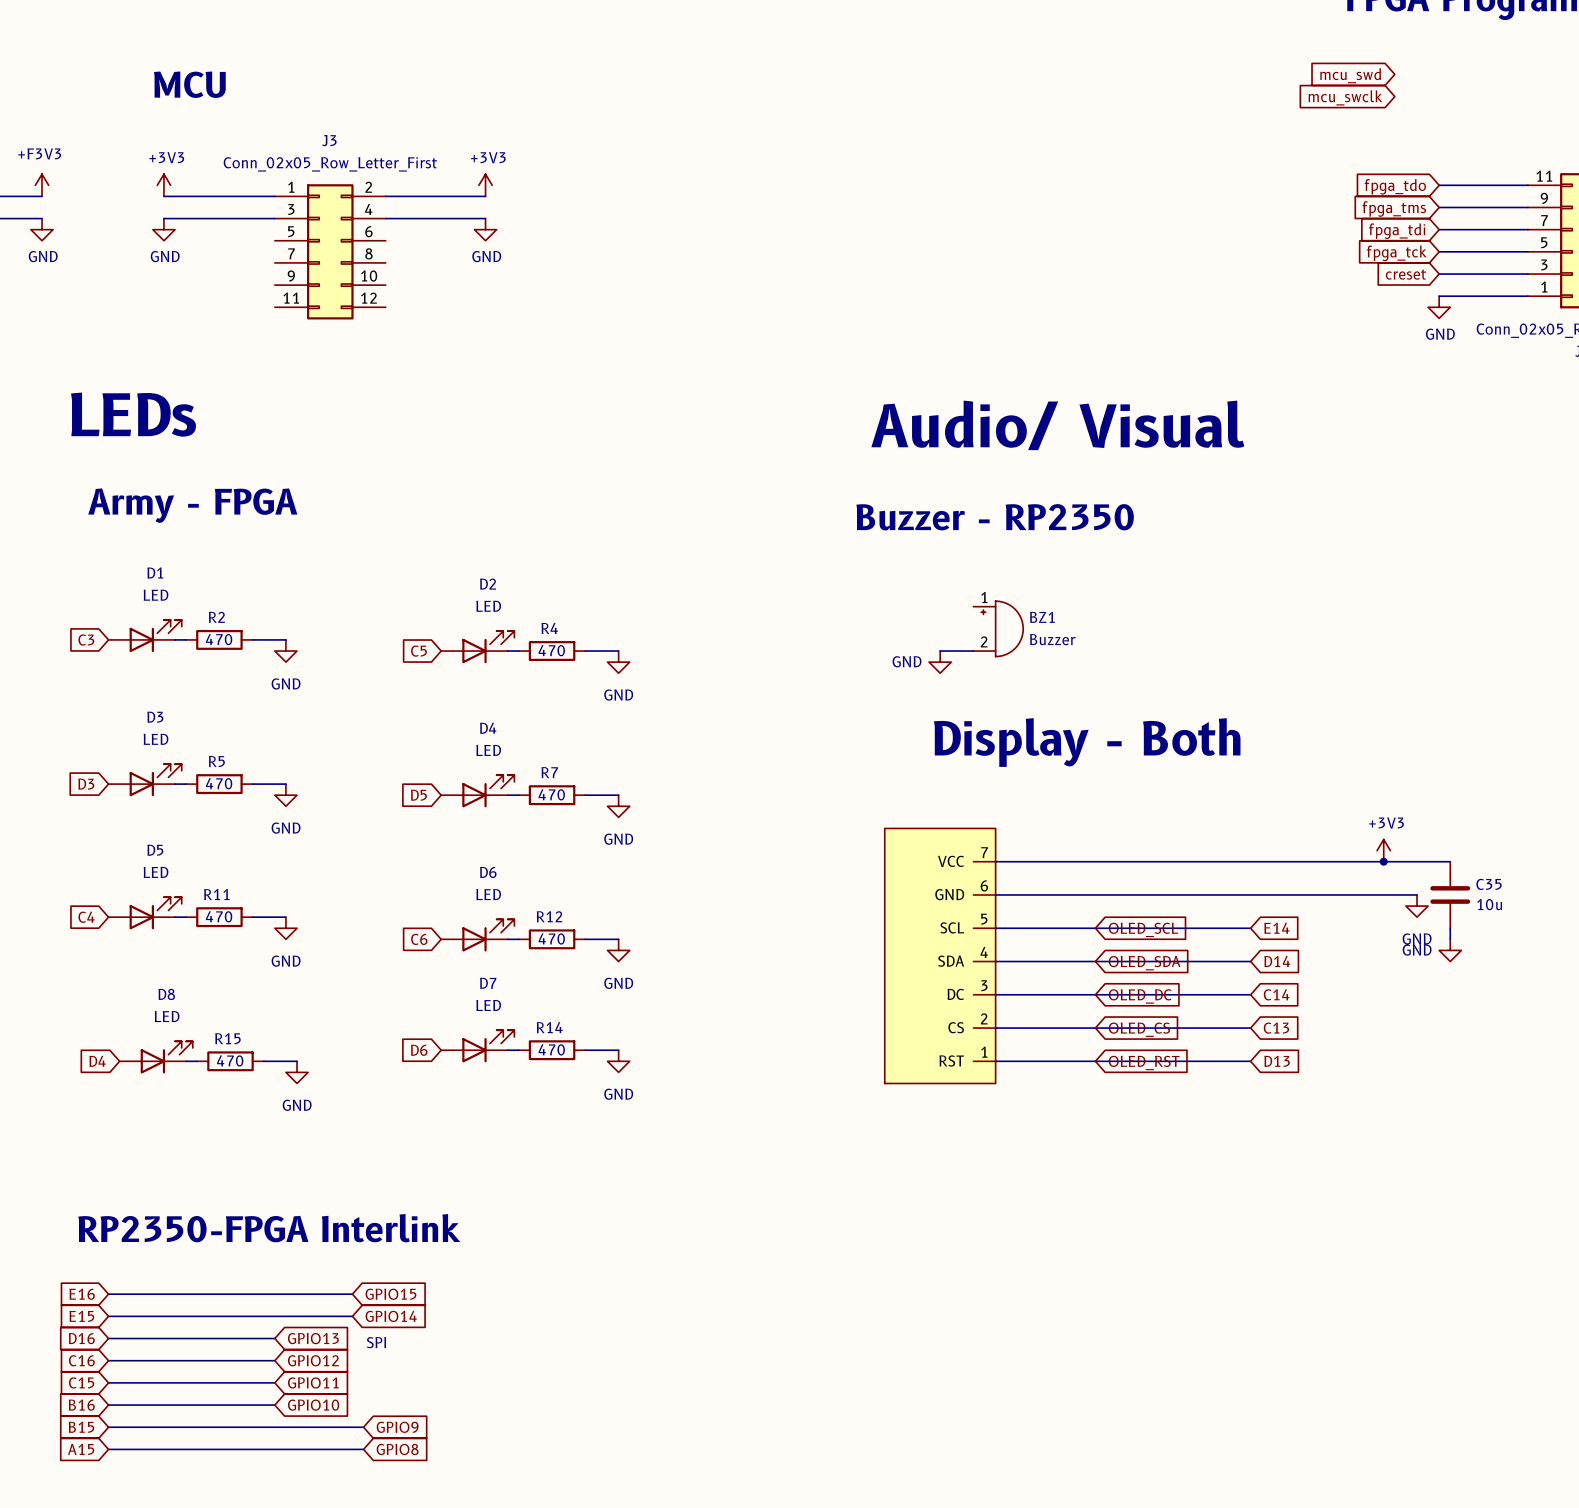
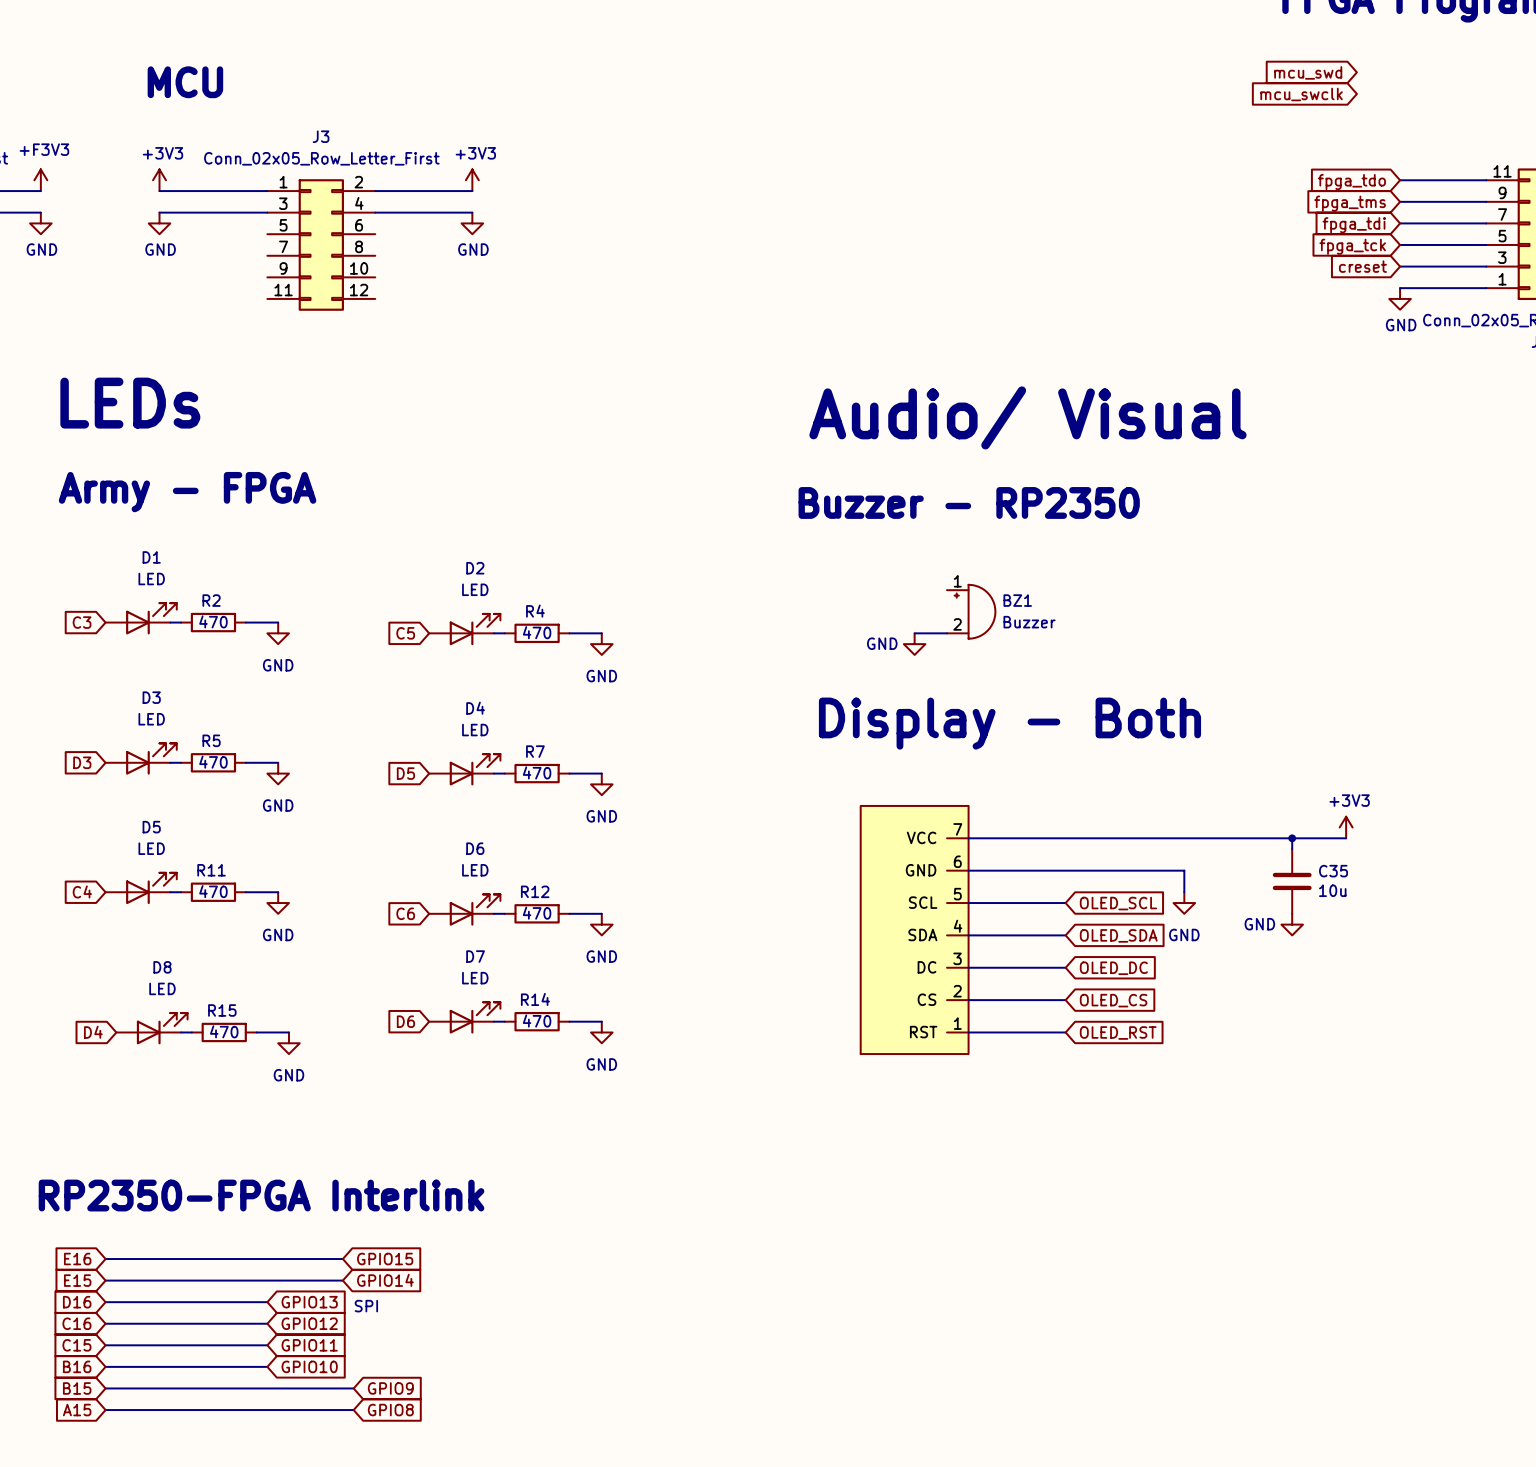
junction: none -> (1292, 838)
wire: (1383, 861) (1450, 861) -> none
junction: (1383, 861) -> none
wire: (1217, 894) (1416, 894) -> (1184, 870) (1184, 892)
C35 position: (1450, 894) -> (1292, 881)
power symbol: GND (1416, 906) -> none
wire: (1095, 928) (1250, 928) -> none
power symbol: none -> GND (1184, 903)
global label: E14 (1276, 928) -> none
wire: (1450, 928) (1450, 939) -> (1292, 838) (1292, 849)
power symbol: none -> GND (1292, 924)
power symbol: GND (1450, 950) -> none
wire: (1095, 961) (1250, 961) -> none
global label: D14 (1277, 961) -> none
wire: (1095, 994) (1250, 994) -> none
global label: C14 (1276, 994) -> none
wire: (1095, 1028) (1250, 1028) -> none
global label: C13 (1276, 1028) -> none
wire: (1095, 1061) (1250, 1061) -> none
global label: D13 (1277, 1061) -> none

